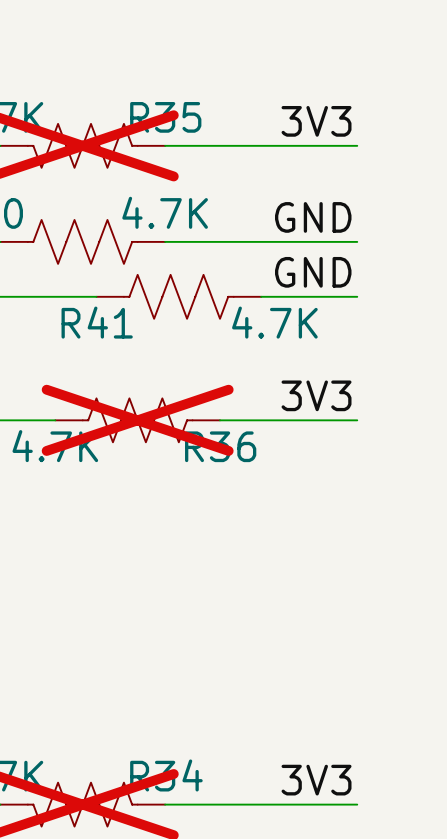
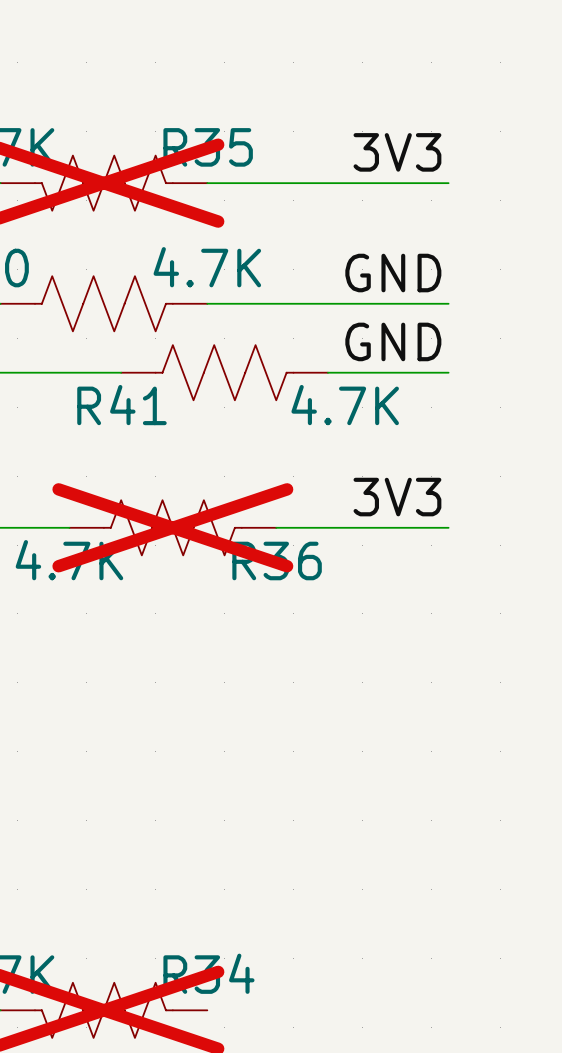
label: 3V3 (316, 780) -> none
wire: (165, 804) (357, 804) -> none

